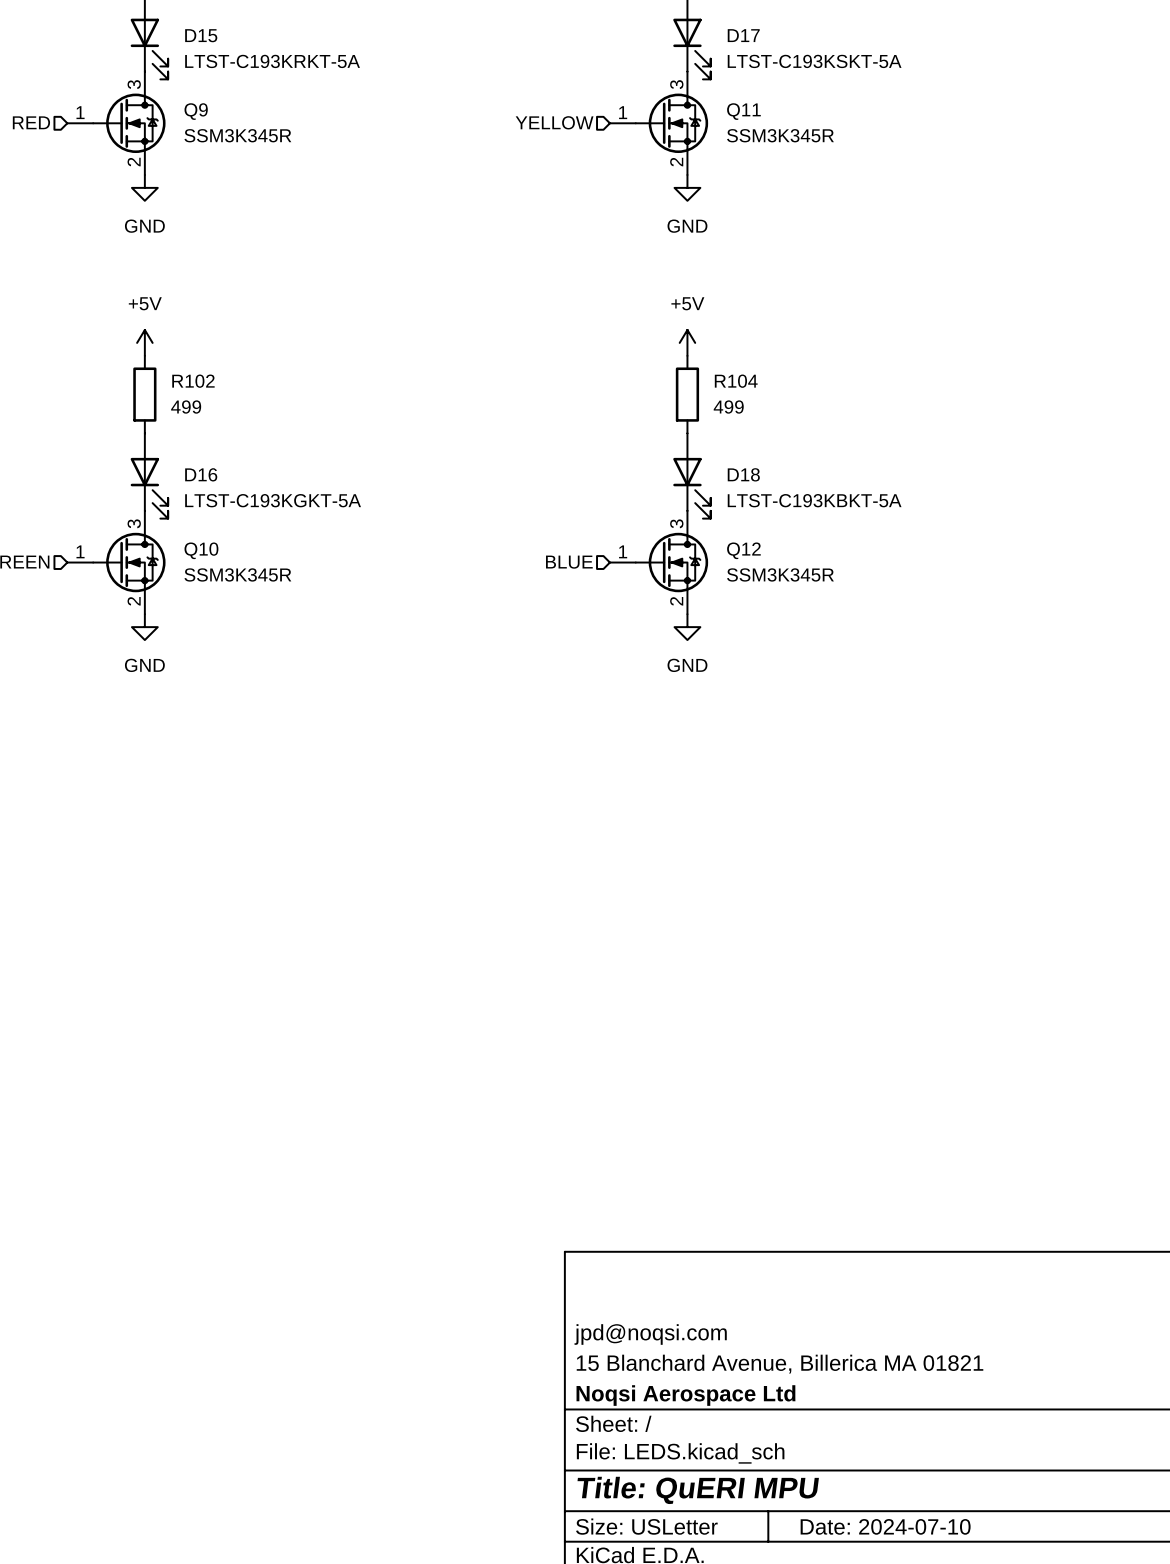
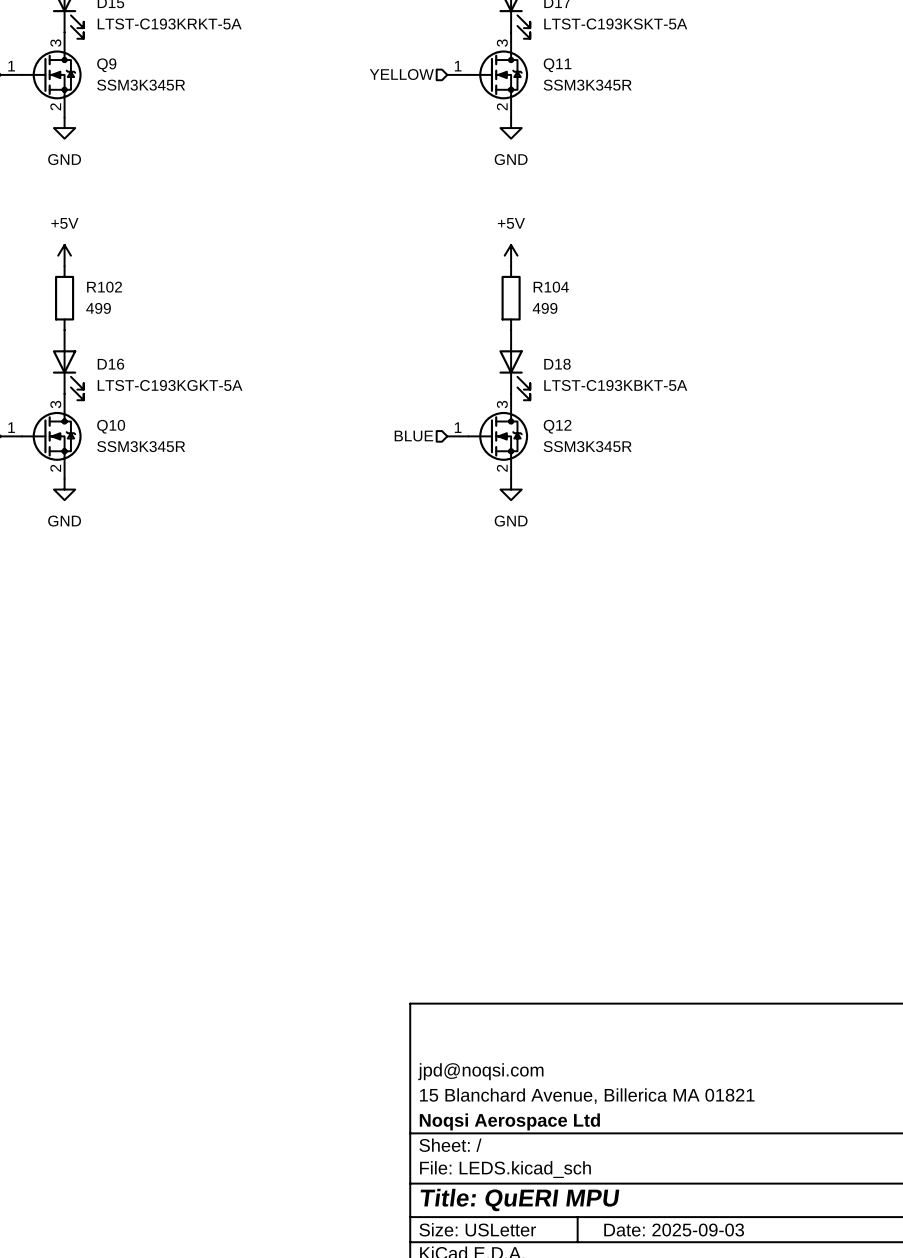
title block: Date: 2024-07-10 (885, 1526) -> Date: 2025-09-03 (674, 1230)

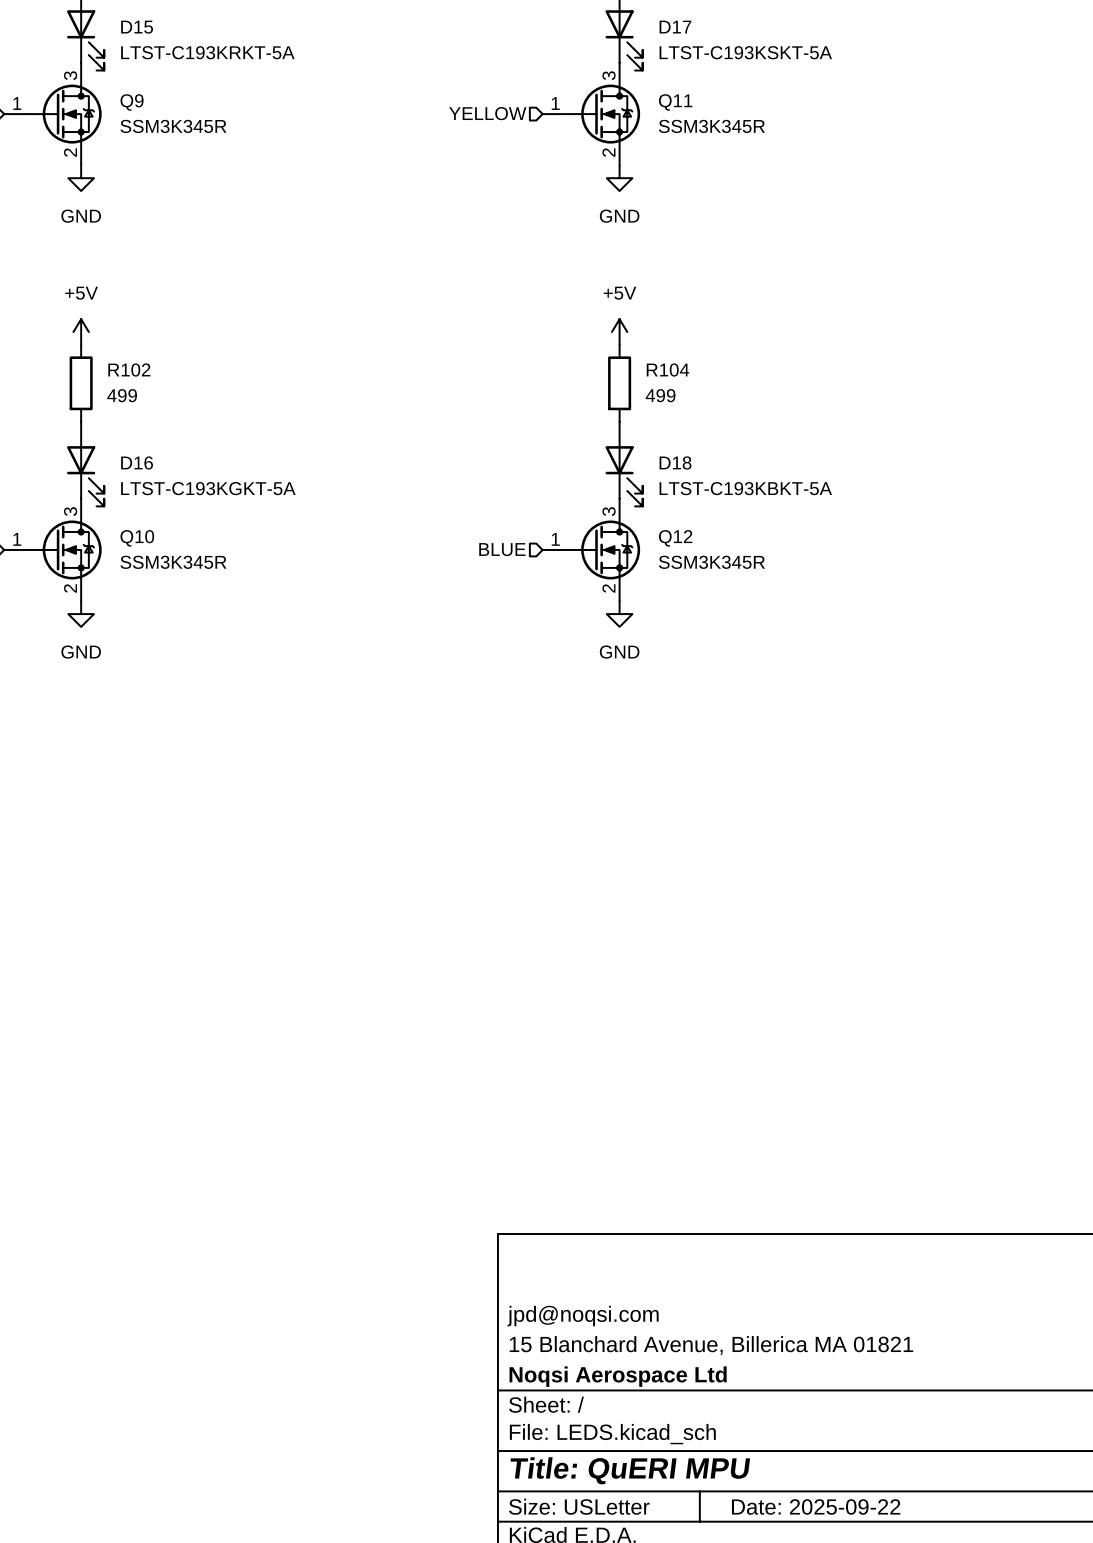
title block: Date: 2025-09-03 (674, 1230) -> Date: 2025-09-22 (816, 1506)

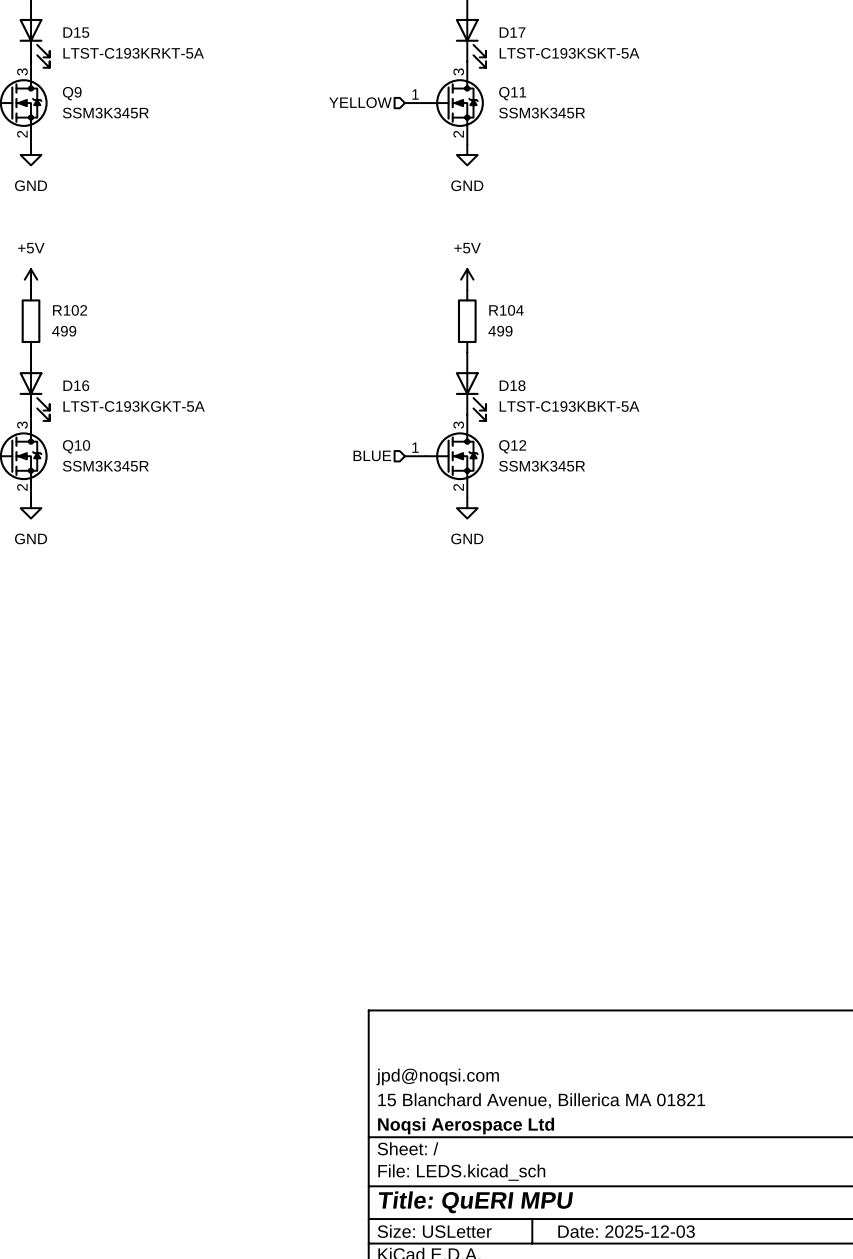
title block: Date: 2025-09-22 (816, 1506) -> Date: 2025-12-03 (626, 1231)

